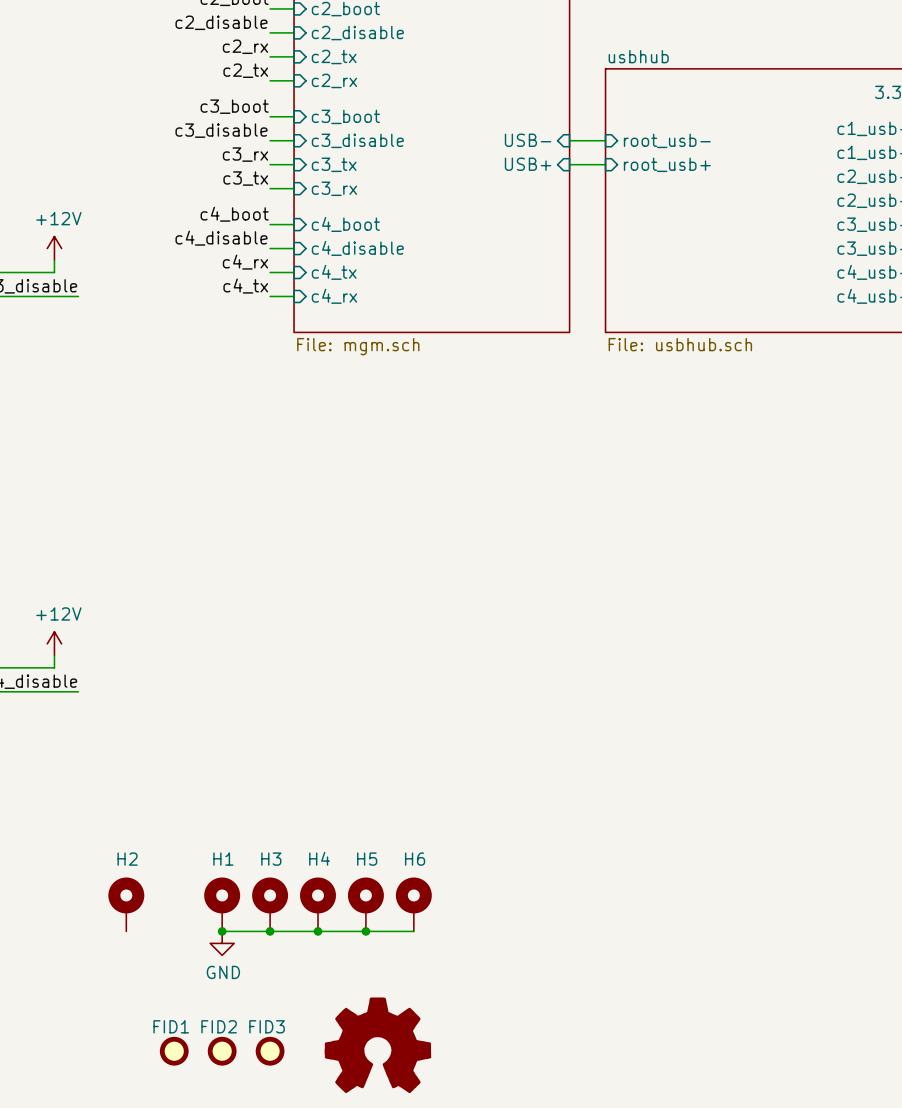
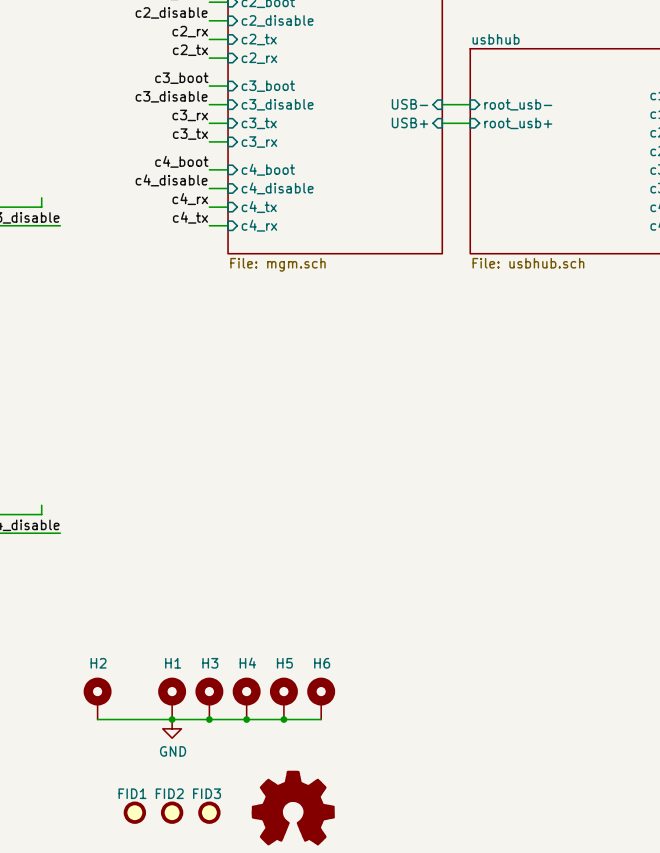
power symbol: +12V (54, 248) -> none
power symbol: +12V (54, 643) -> none
wire: none -> (97, 719) (172, 719)

